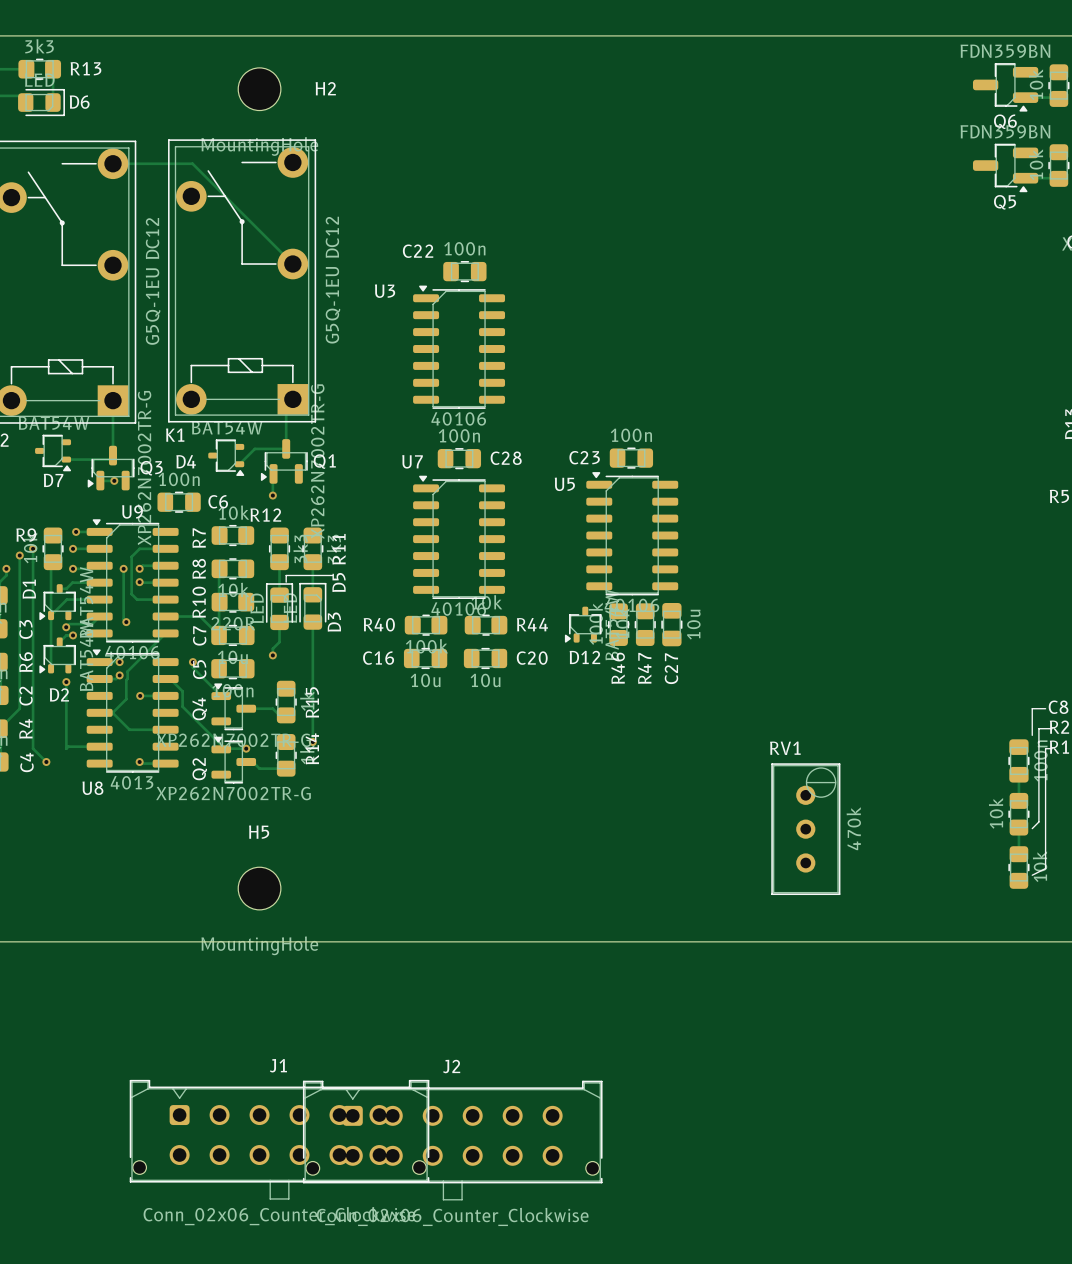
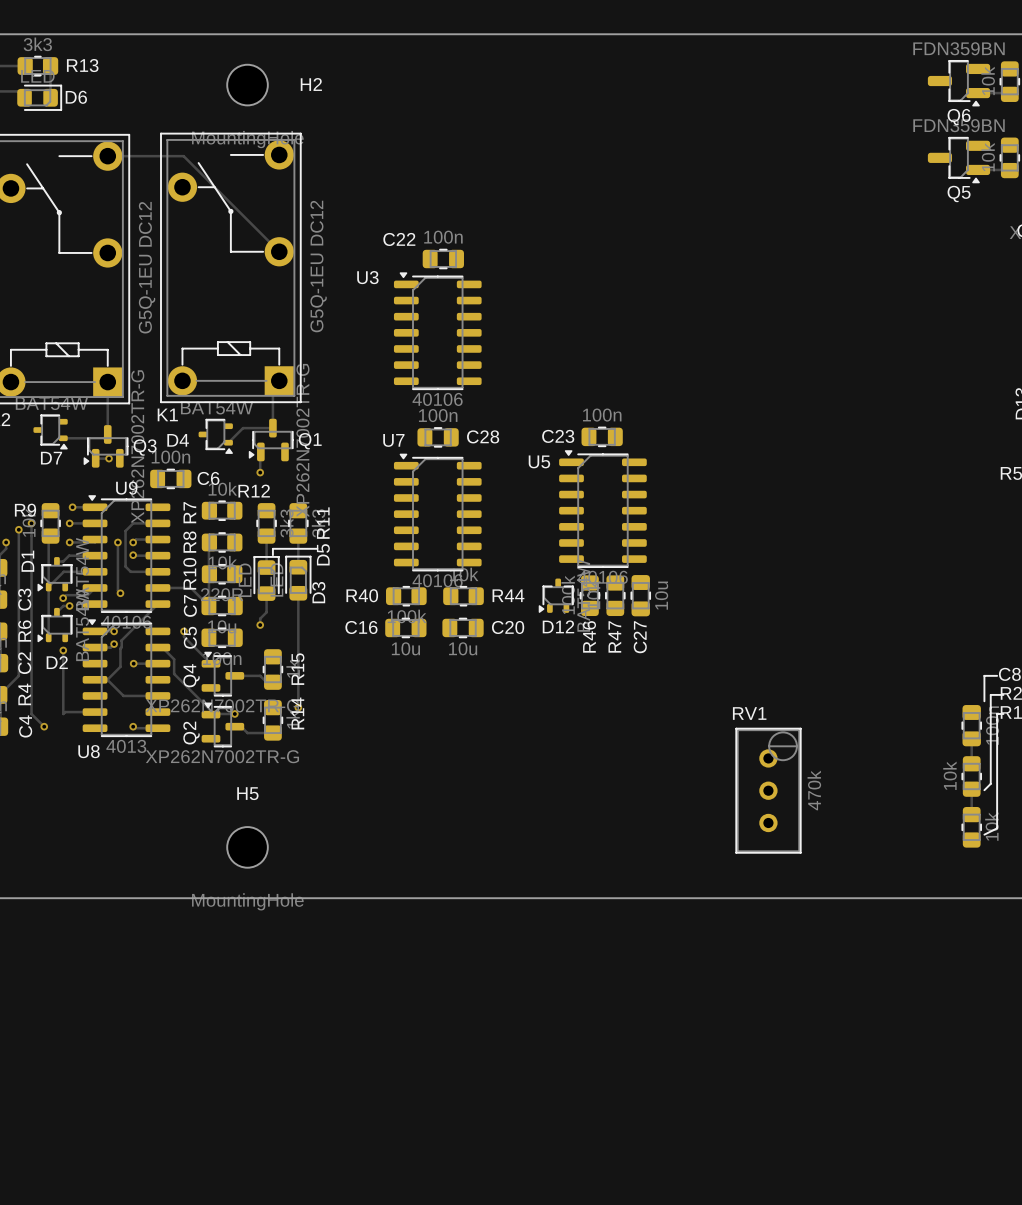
J1: Conn_02x06_Counter_Clockwise (279, 1139) -> none
J2: Conn_02x06_Counter_Clockwise (452, 1140) -> none

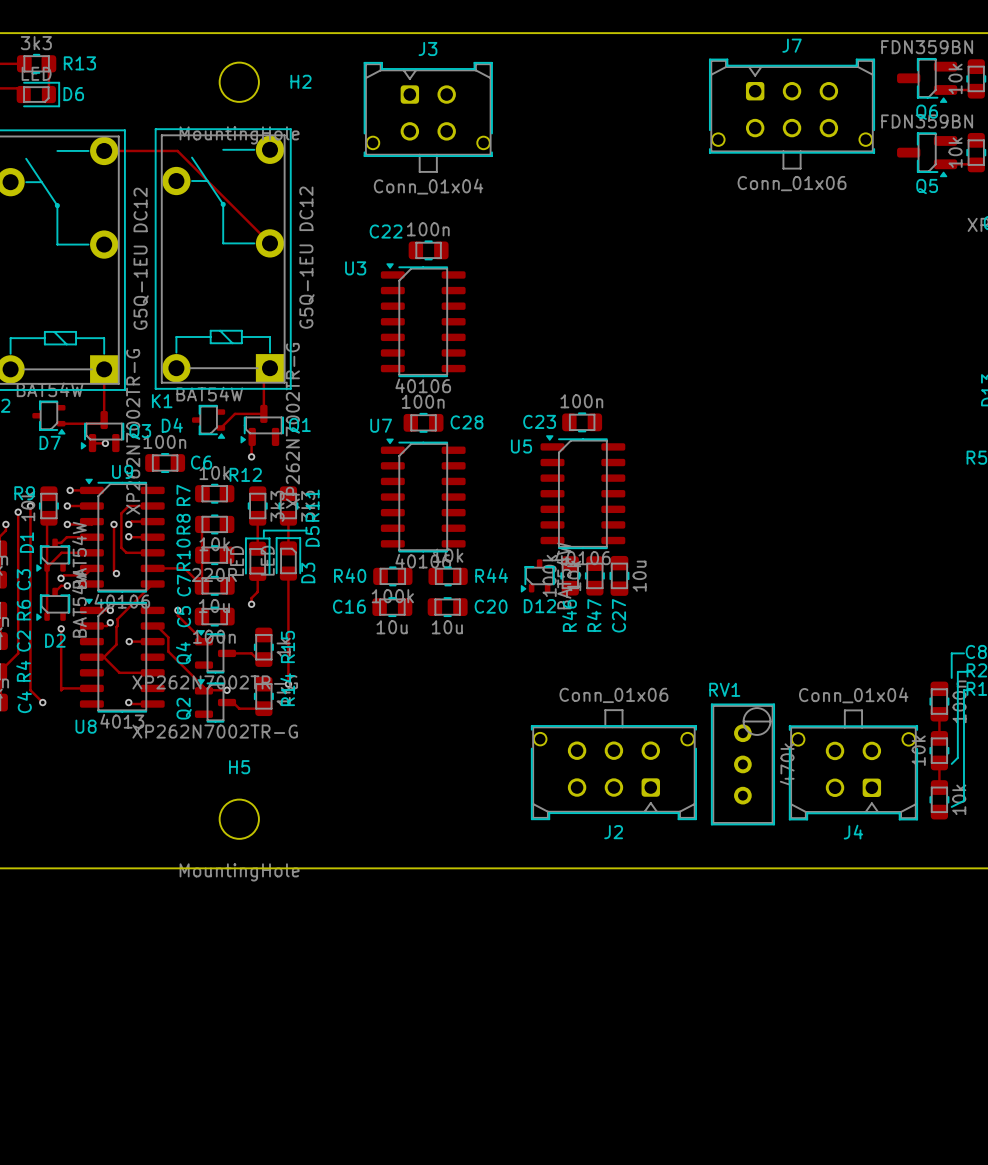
J7: none -> Conn_01x06 (792, 114)
J3: none -> Conn_01x04 (428, 117)
J2: none -> Conn_01x06 (613, 764)
J4: none -> Conn_01x04 (853, 764)

